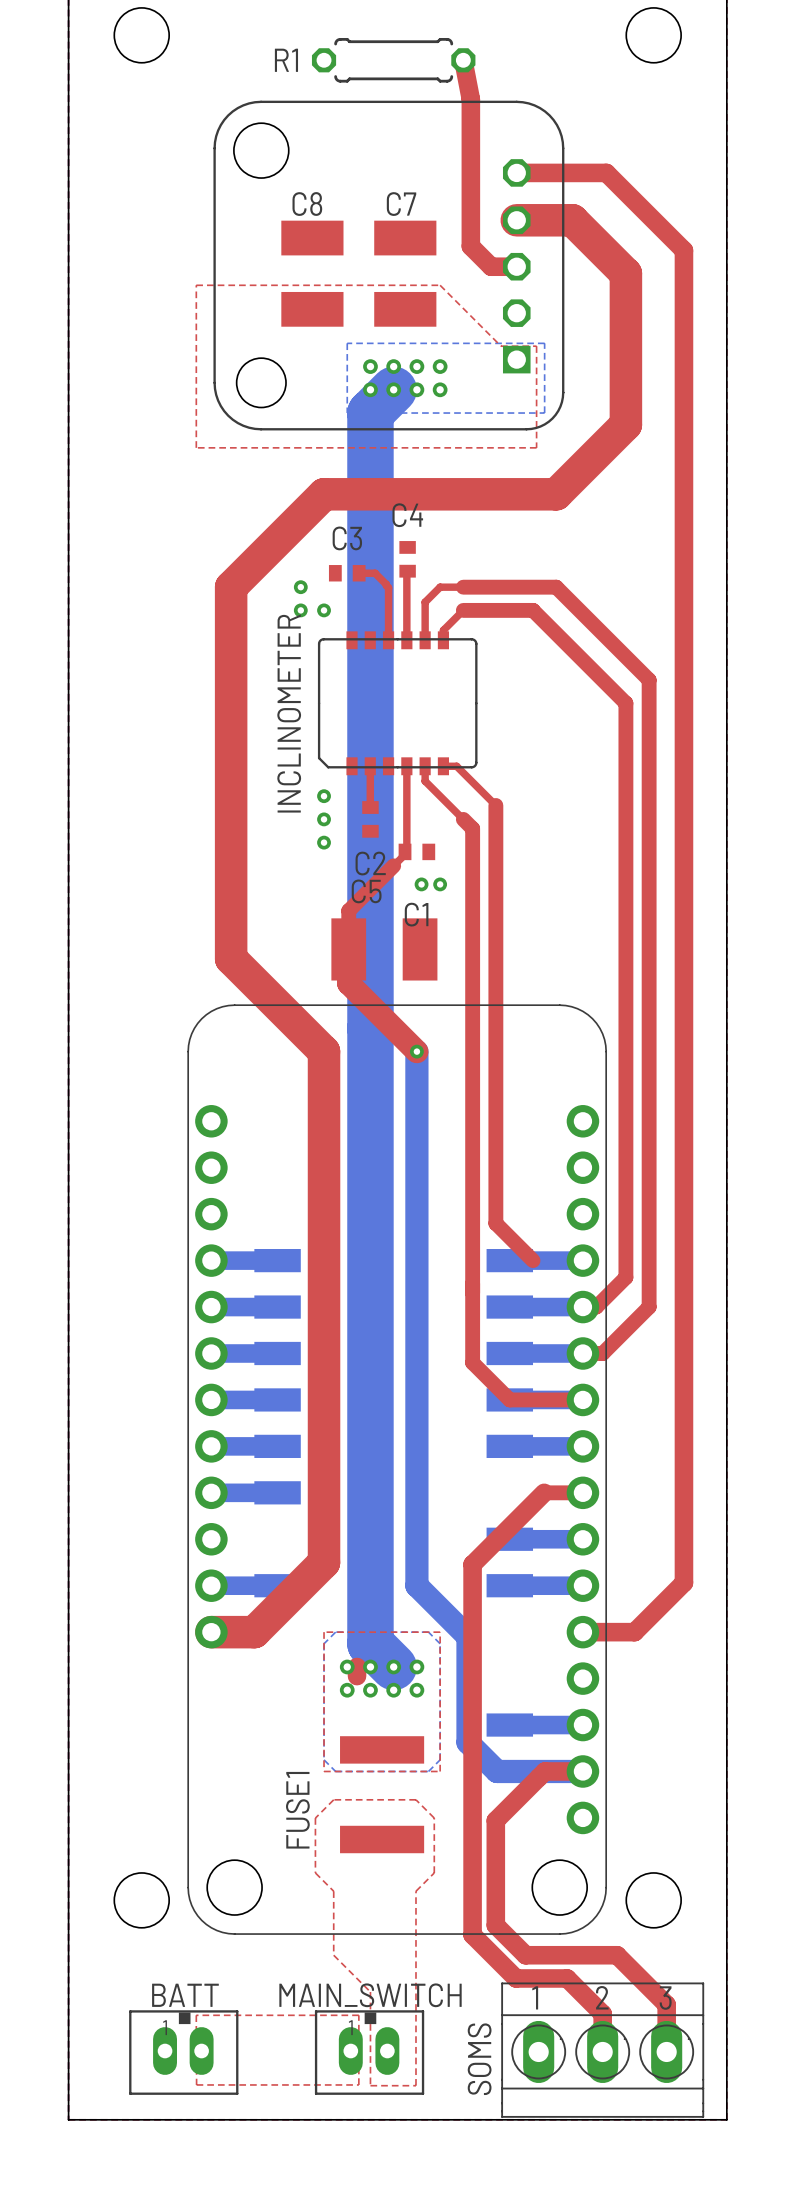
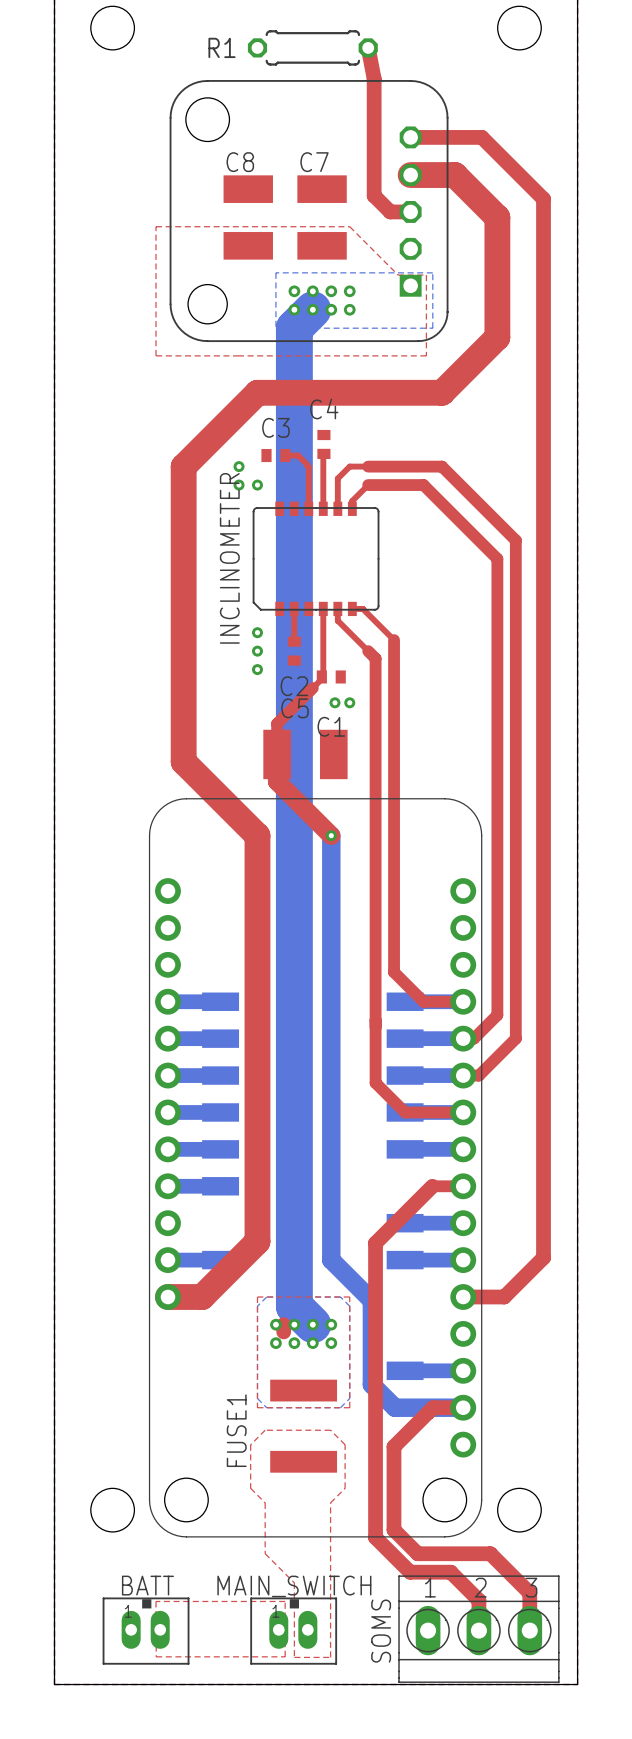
top track: none -> (423, 1001) (463, 1001)

